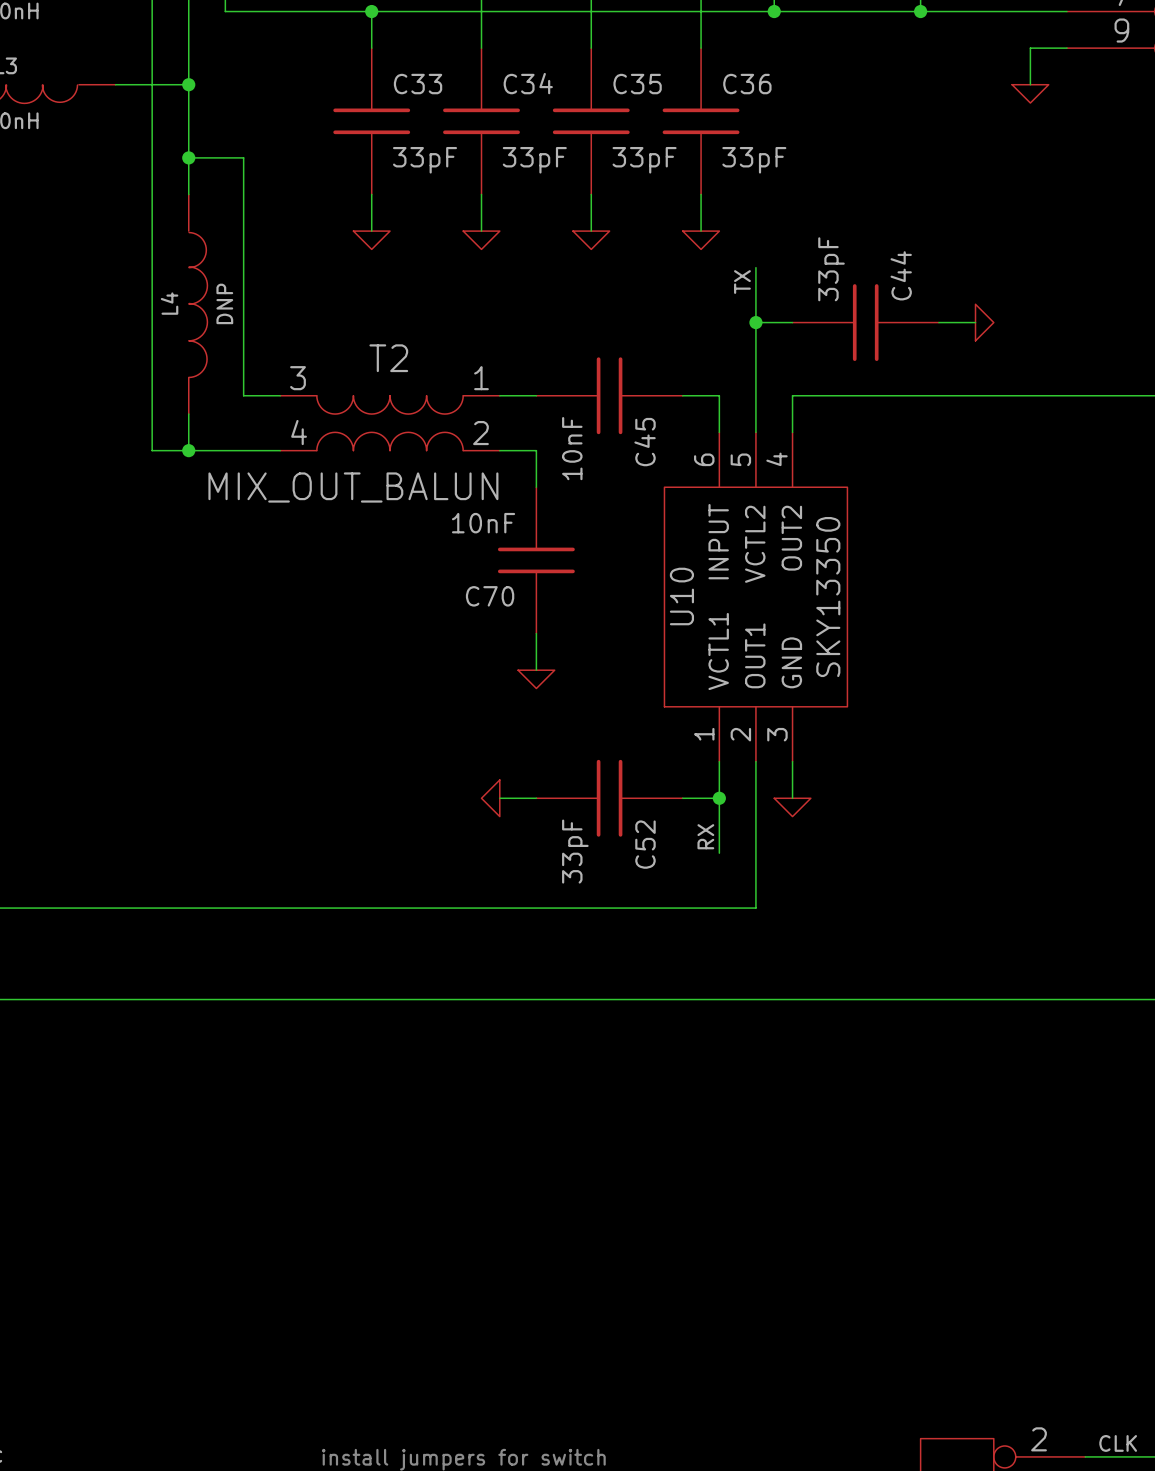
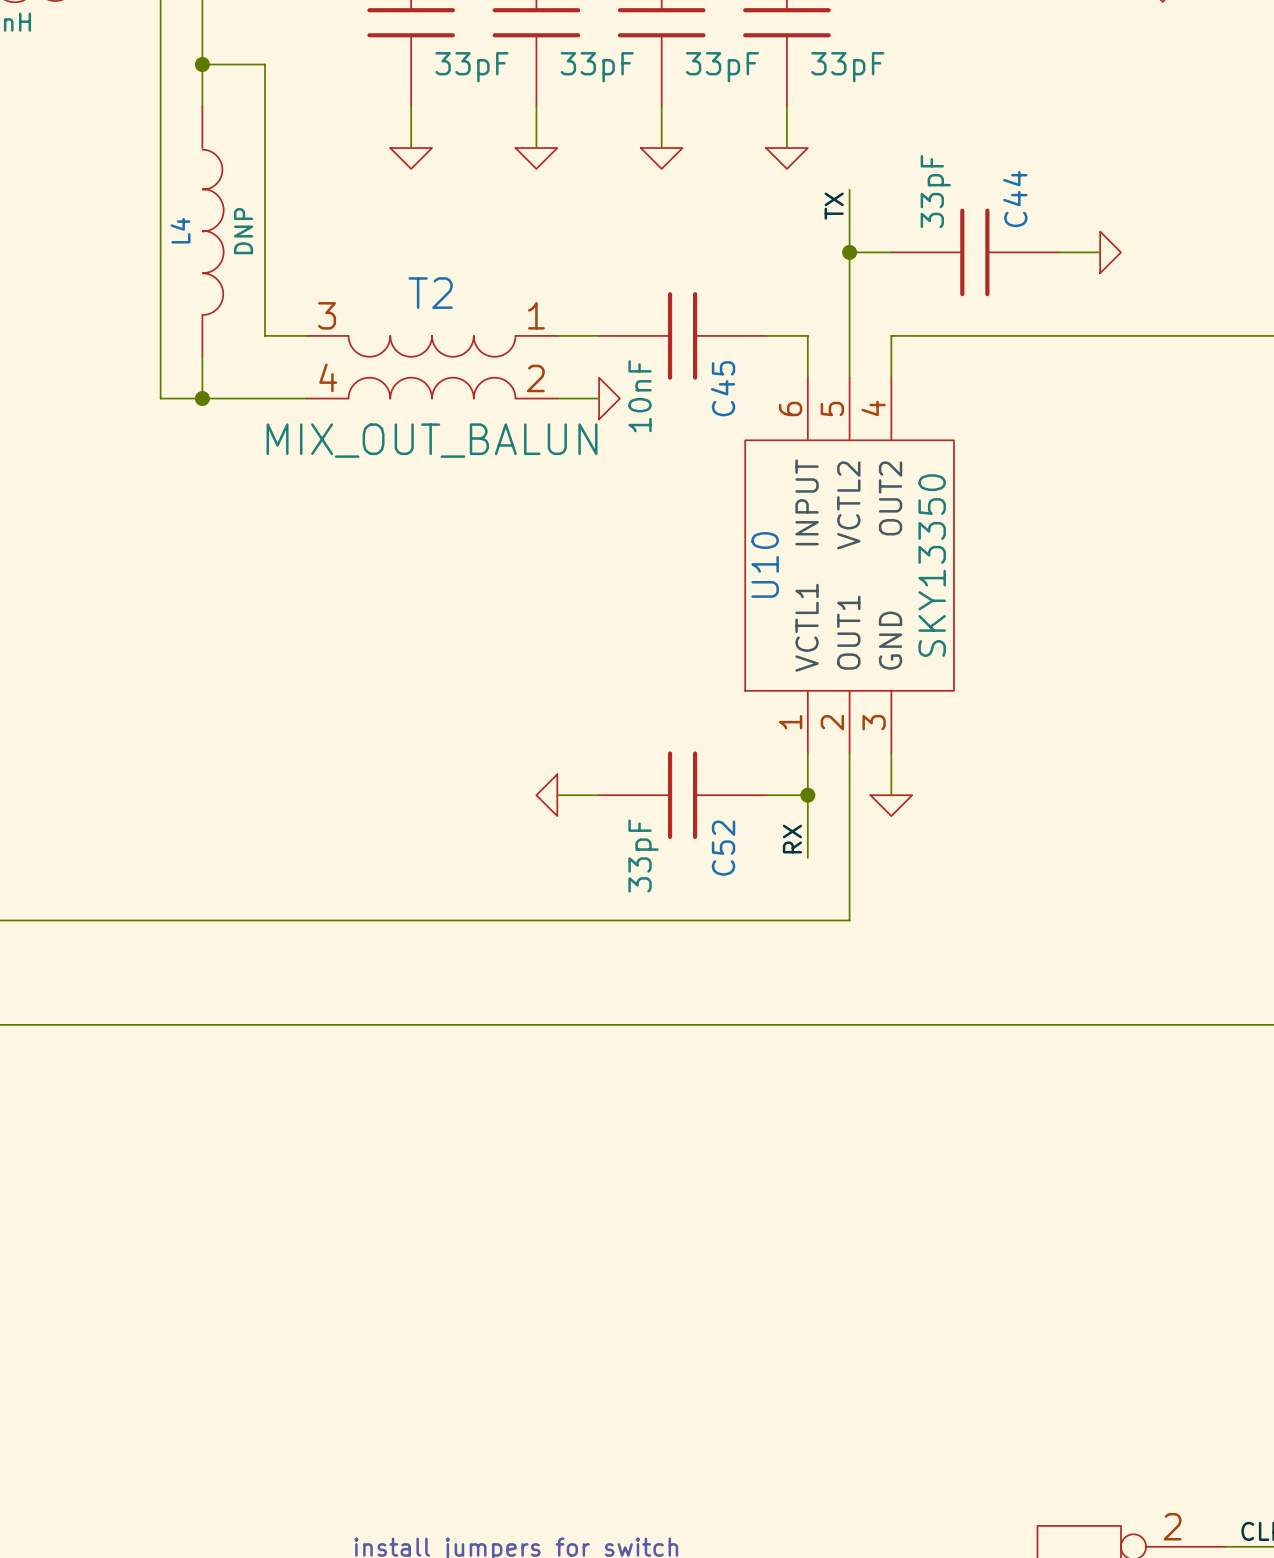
T2 value position: MIX_OUT_BALUN (353, 487) -> MIX_OUT_BALUN (432, 440)
C70: 10nF (536, 560) -> none
wire: (536, 633) (536, 670) -> none
power symbol rotation: 0° (536, 679) -> 90° counterclockwise (609, 398)
power symbol position: (536, 679) -> (609, 398)

